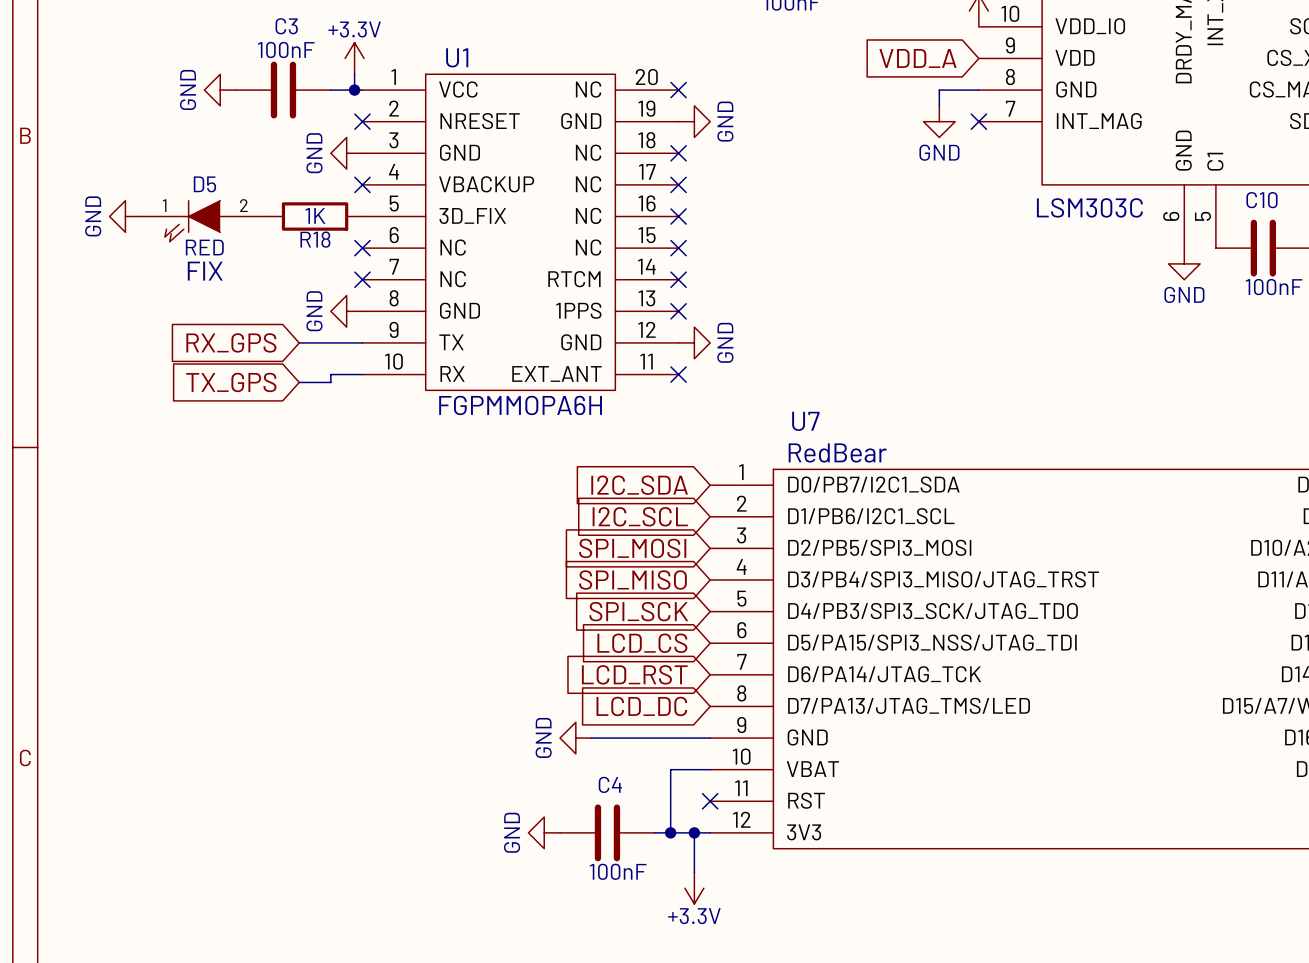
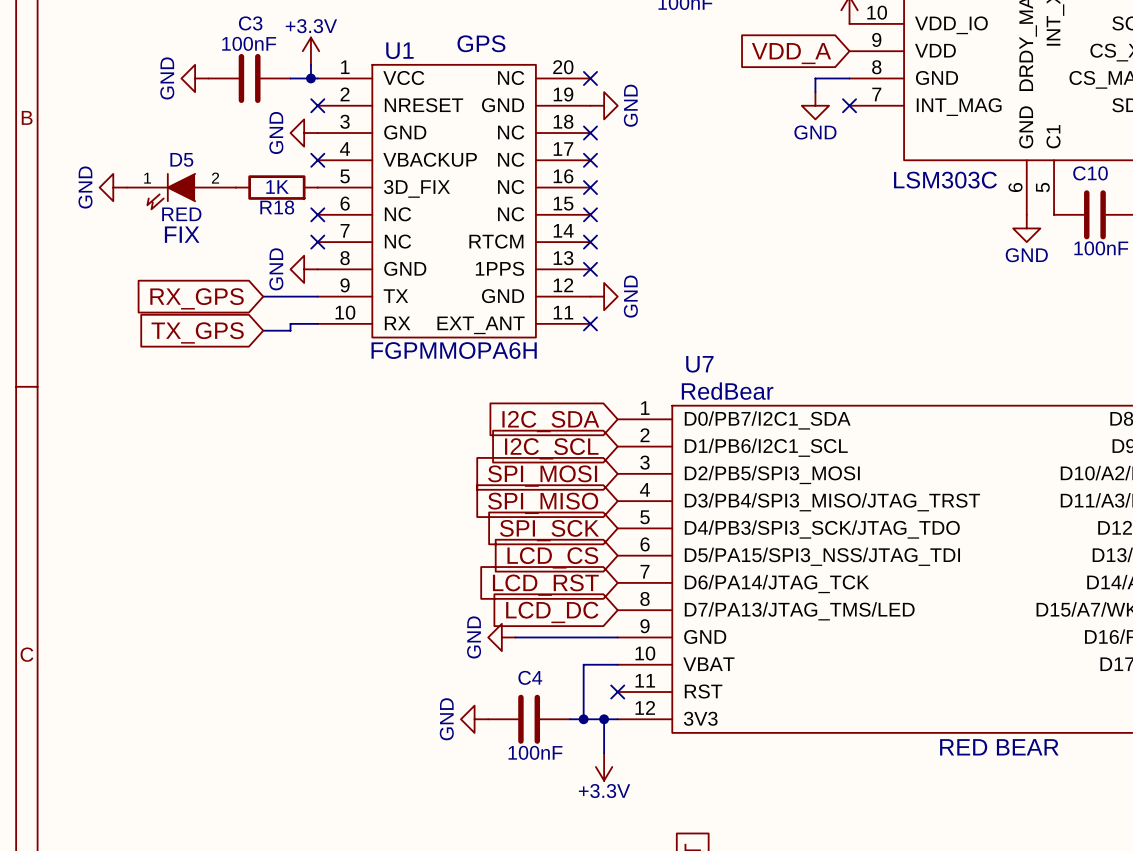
U1 text: none -> GPS (481, 43)
text: none -> RED BEAR (999, 747)

